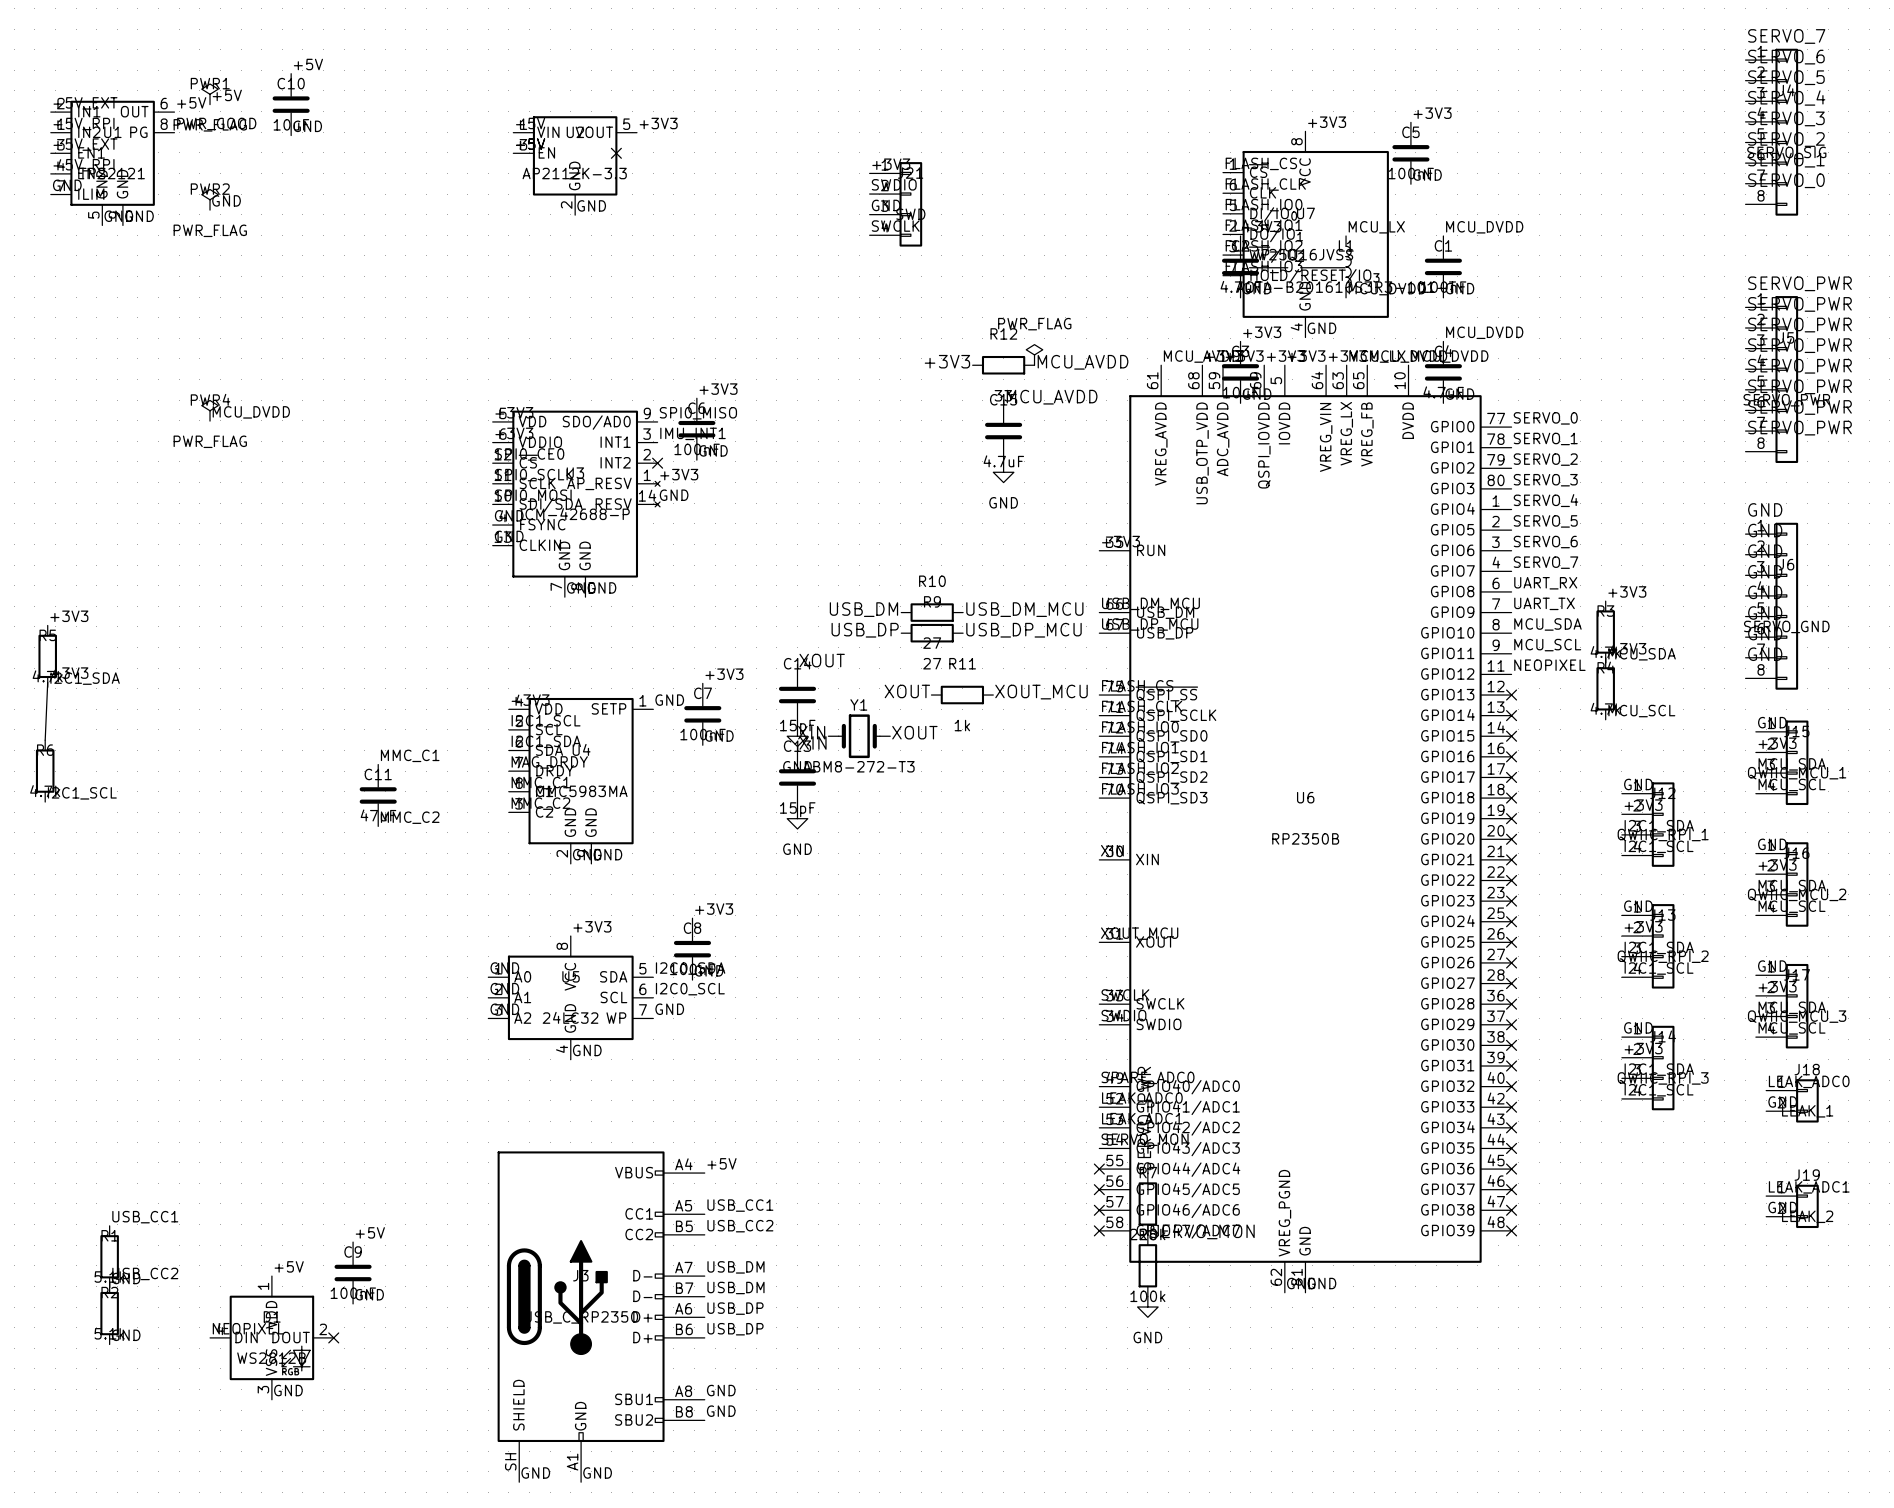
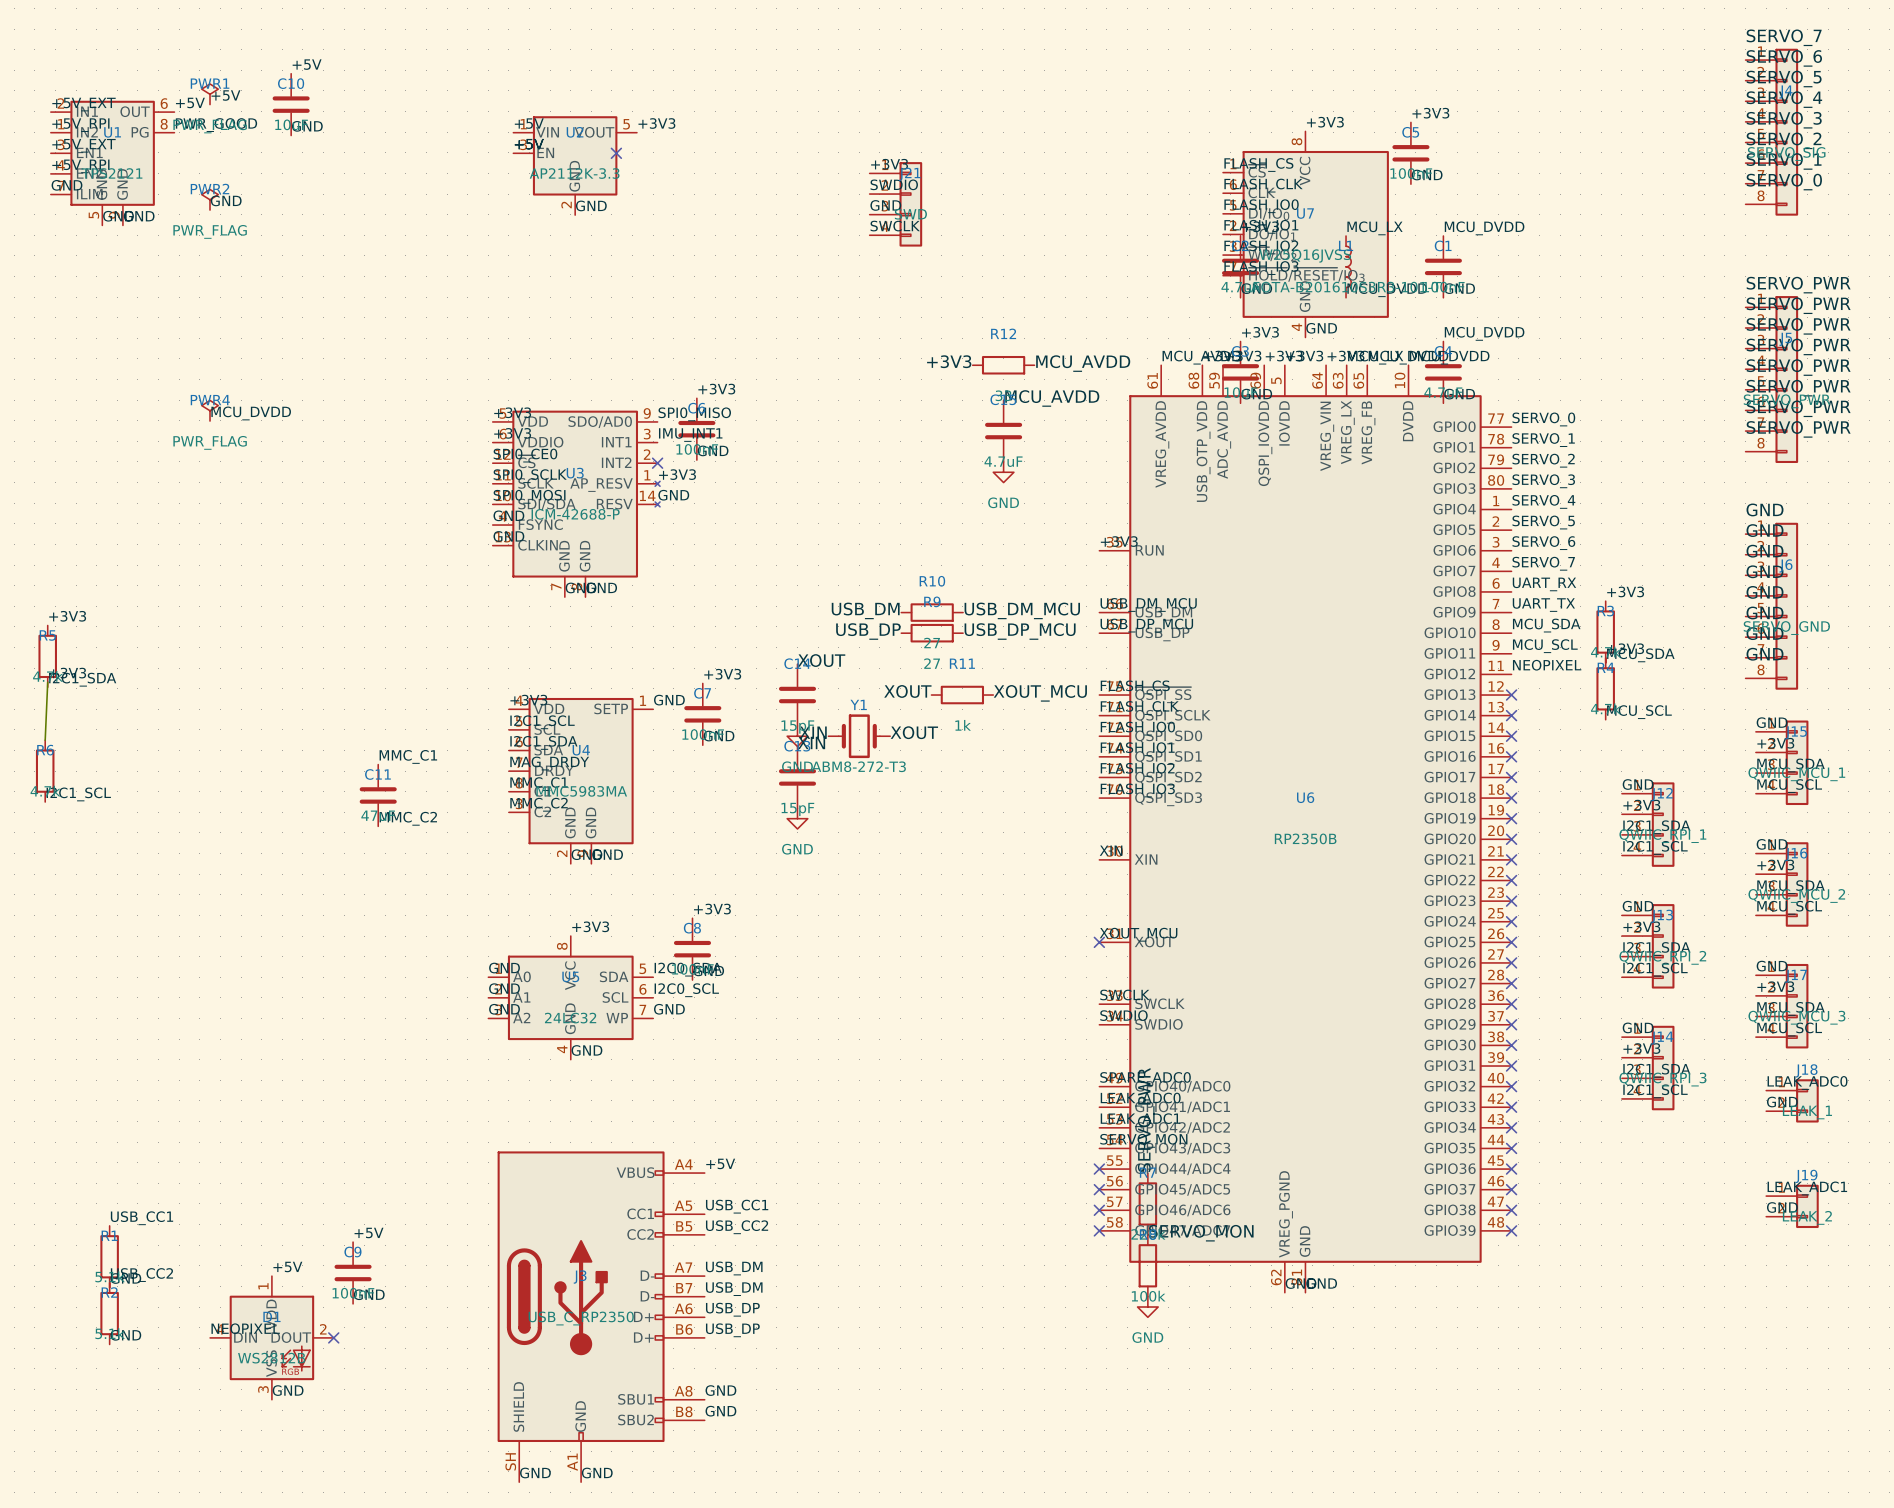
power symbol: PWR_FLAG (1034, 354) -> none
no-connect mark: none -> (1099, 942)

